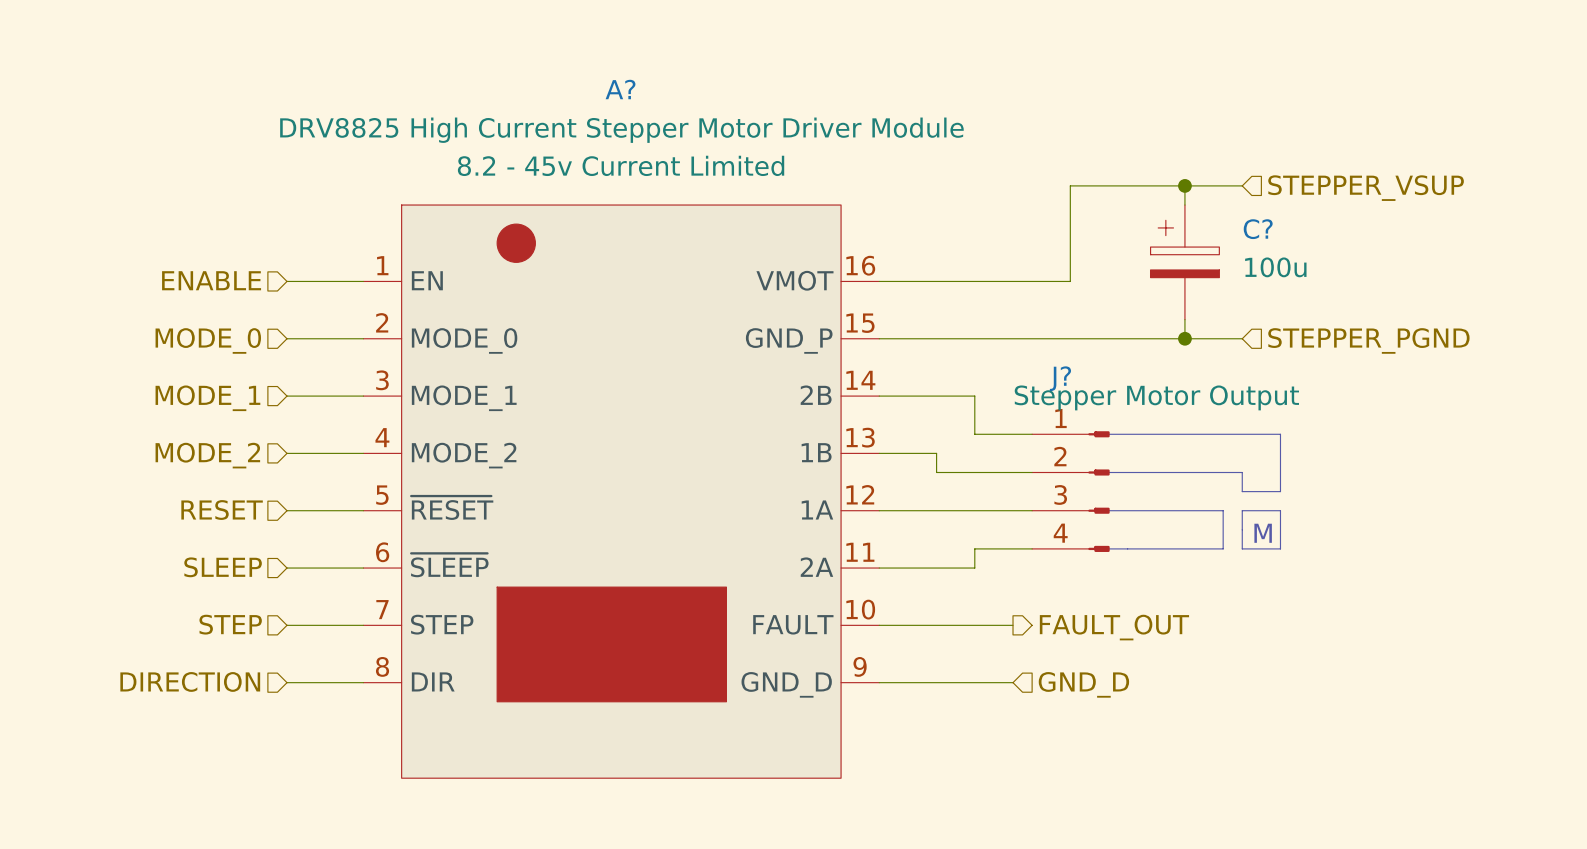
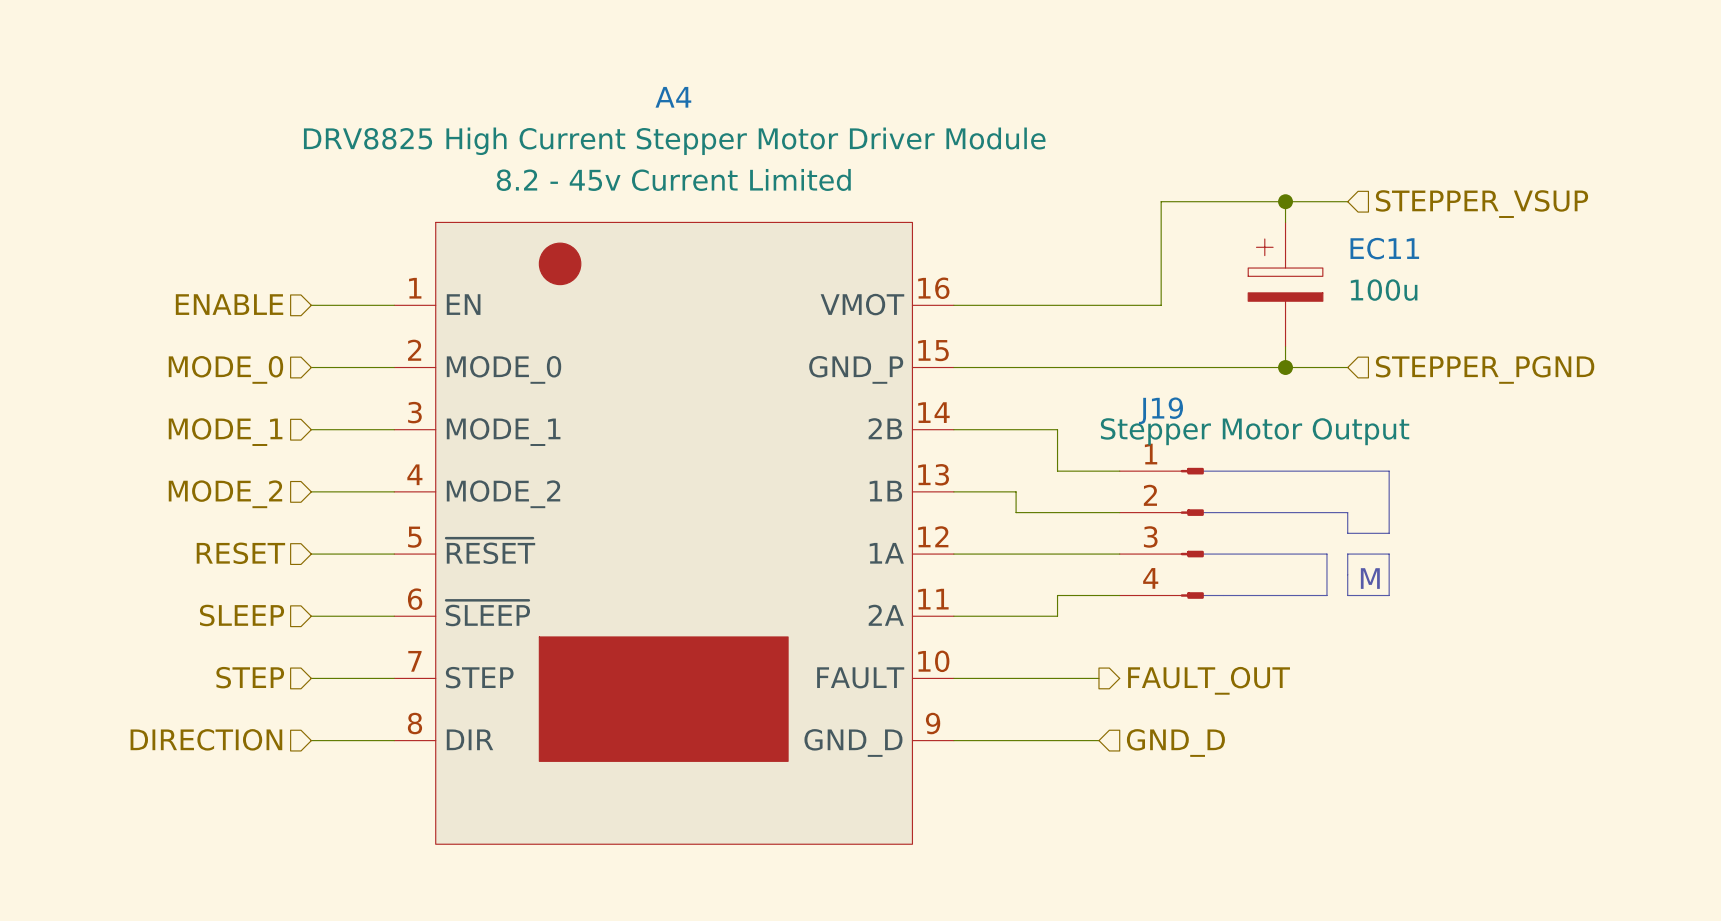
A? name: A? (620, 89) -> A4 (673, 97)
C? name: C? (1258, 229) -> EC11 (1384, 248)
J? name: J? (1060, 378) -> J19 (1160, 410)

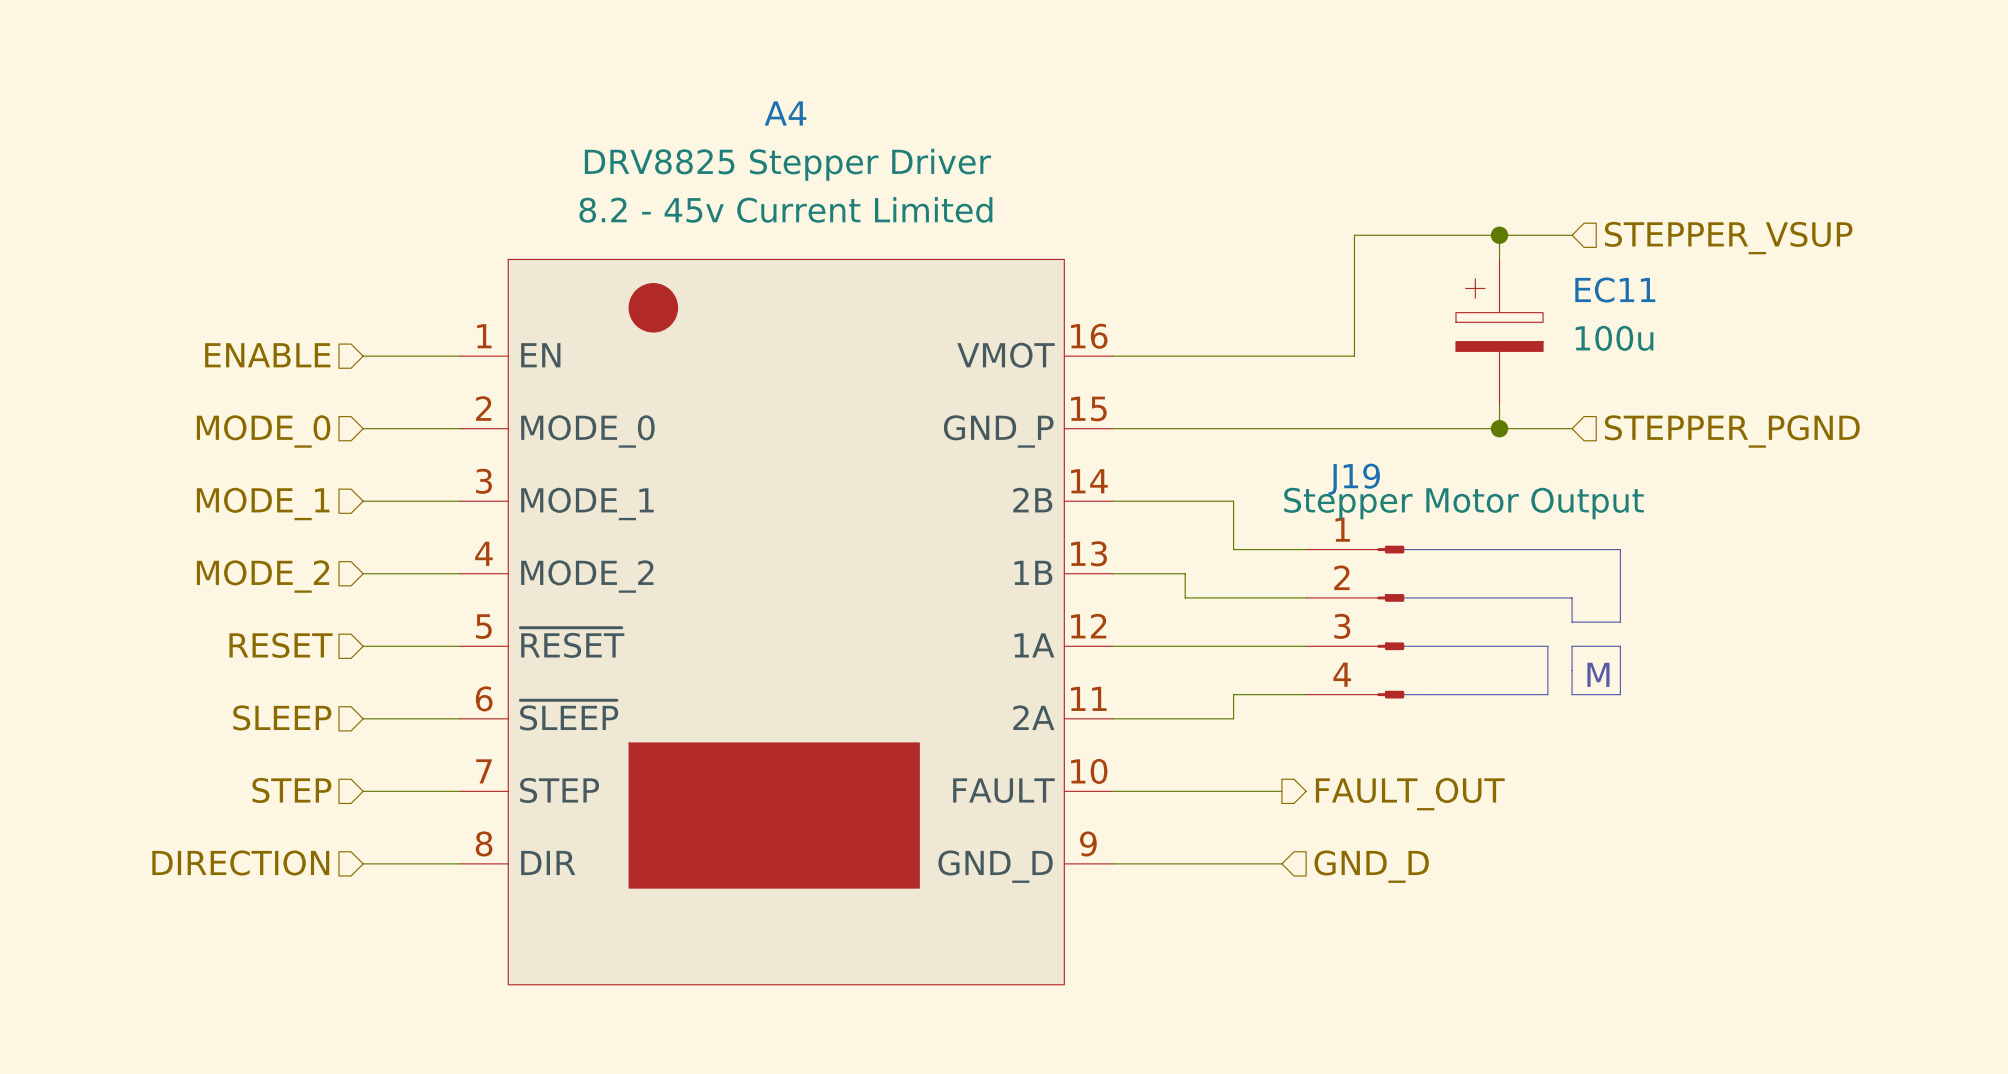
A4 value: DRV8825 High Current Stepper Motor Driver Module (674, 141) -> DRV8825 Stepper Driver (787, 164)

